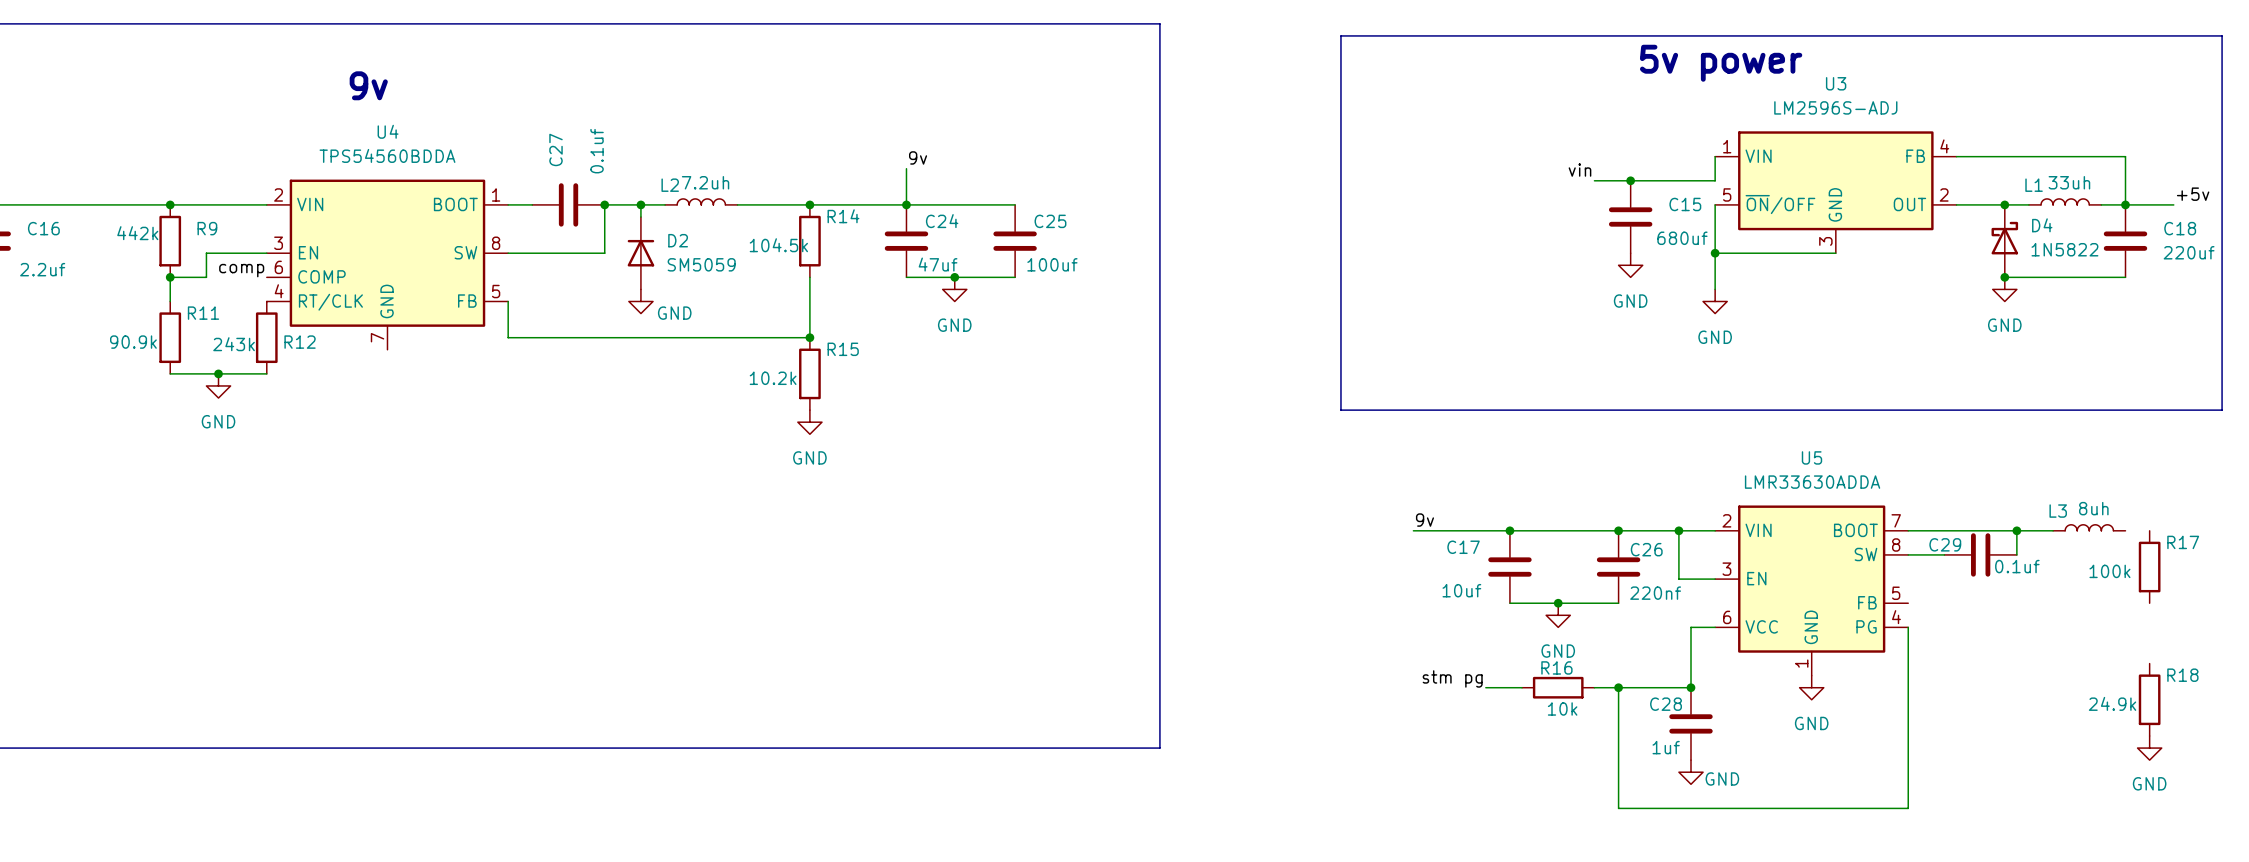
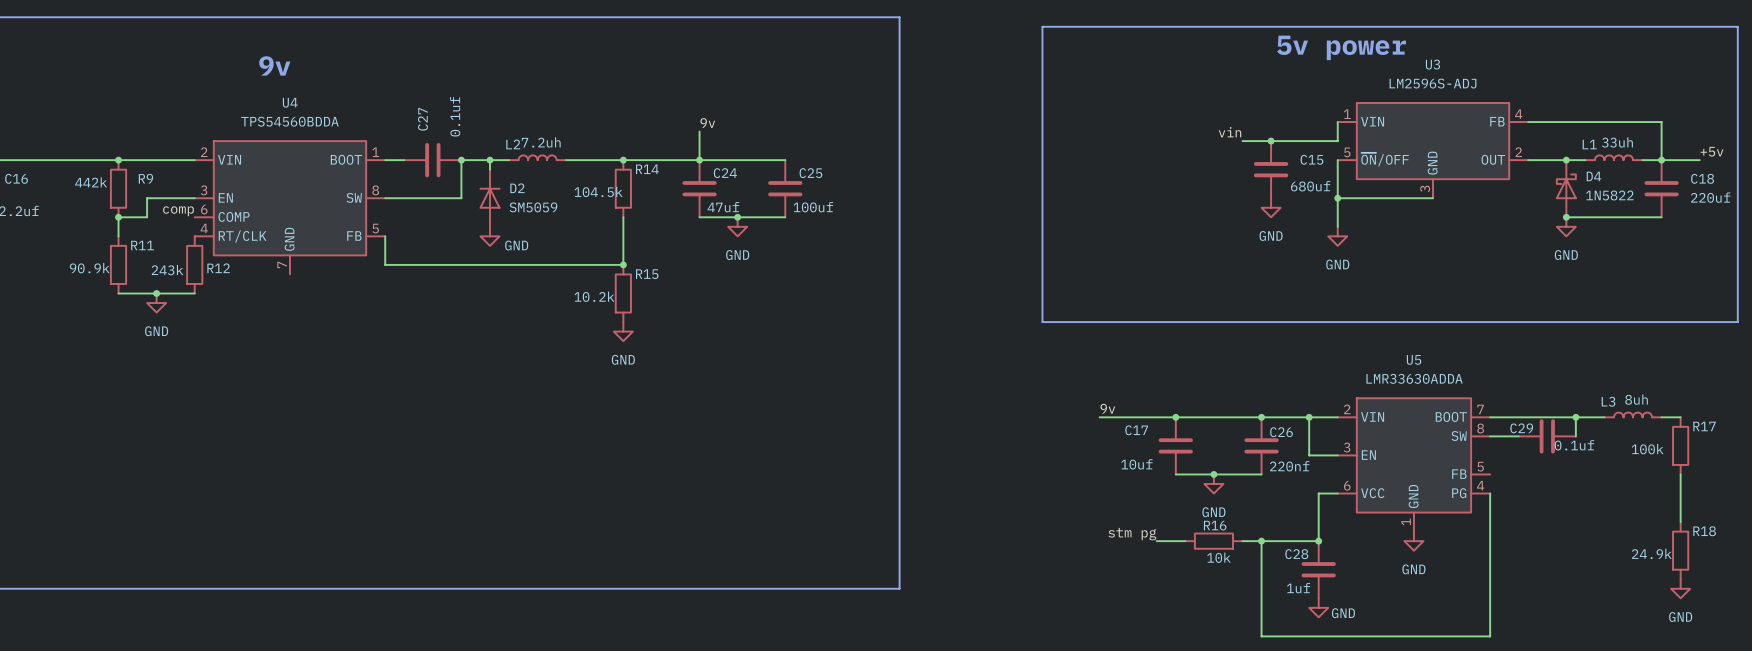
wire: none -> (1661, 417) (1680, 417)
wire: none -> (1680, 474) (1680, 522)

